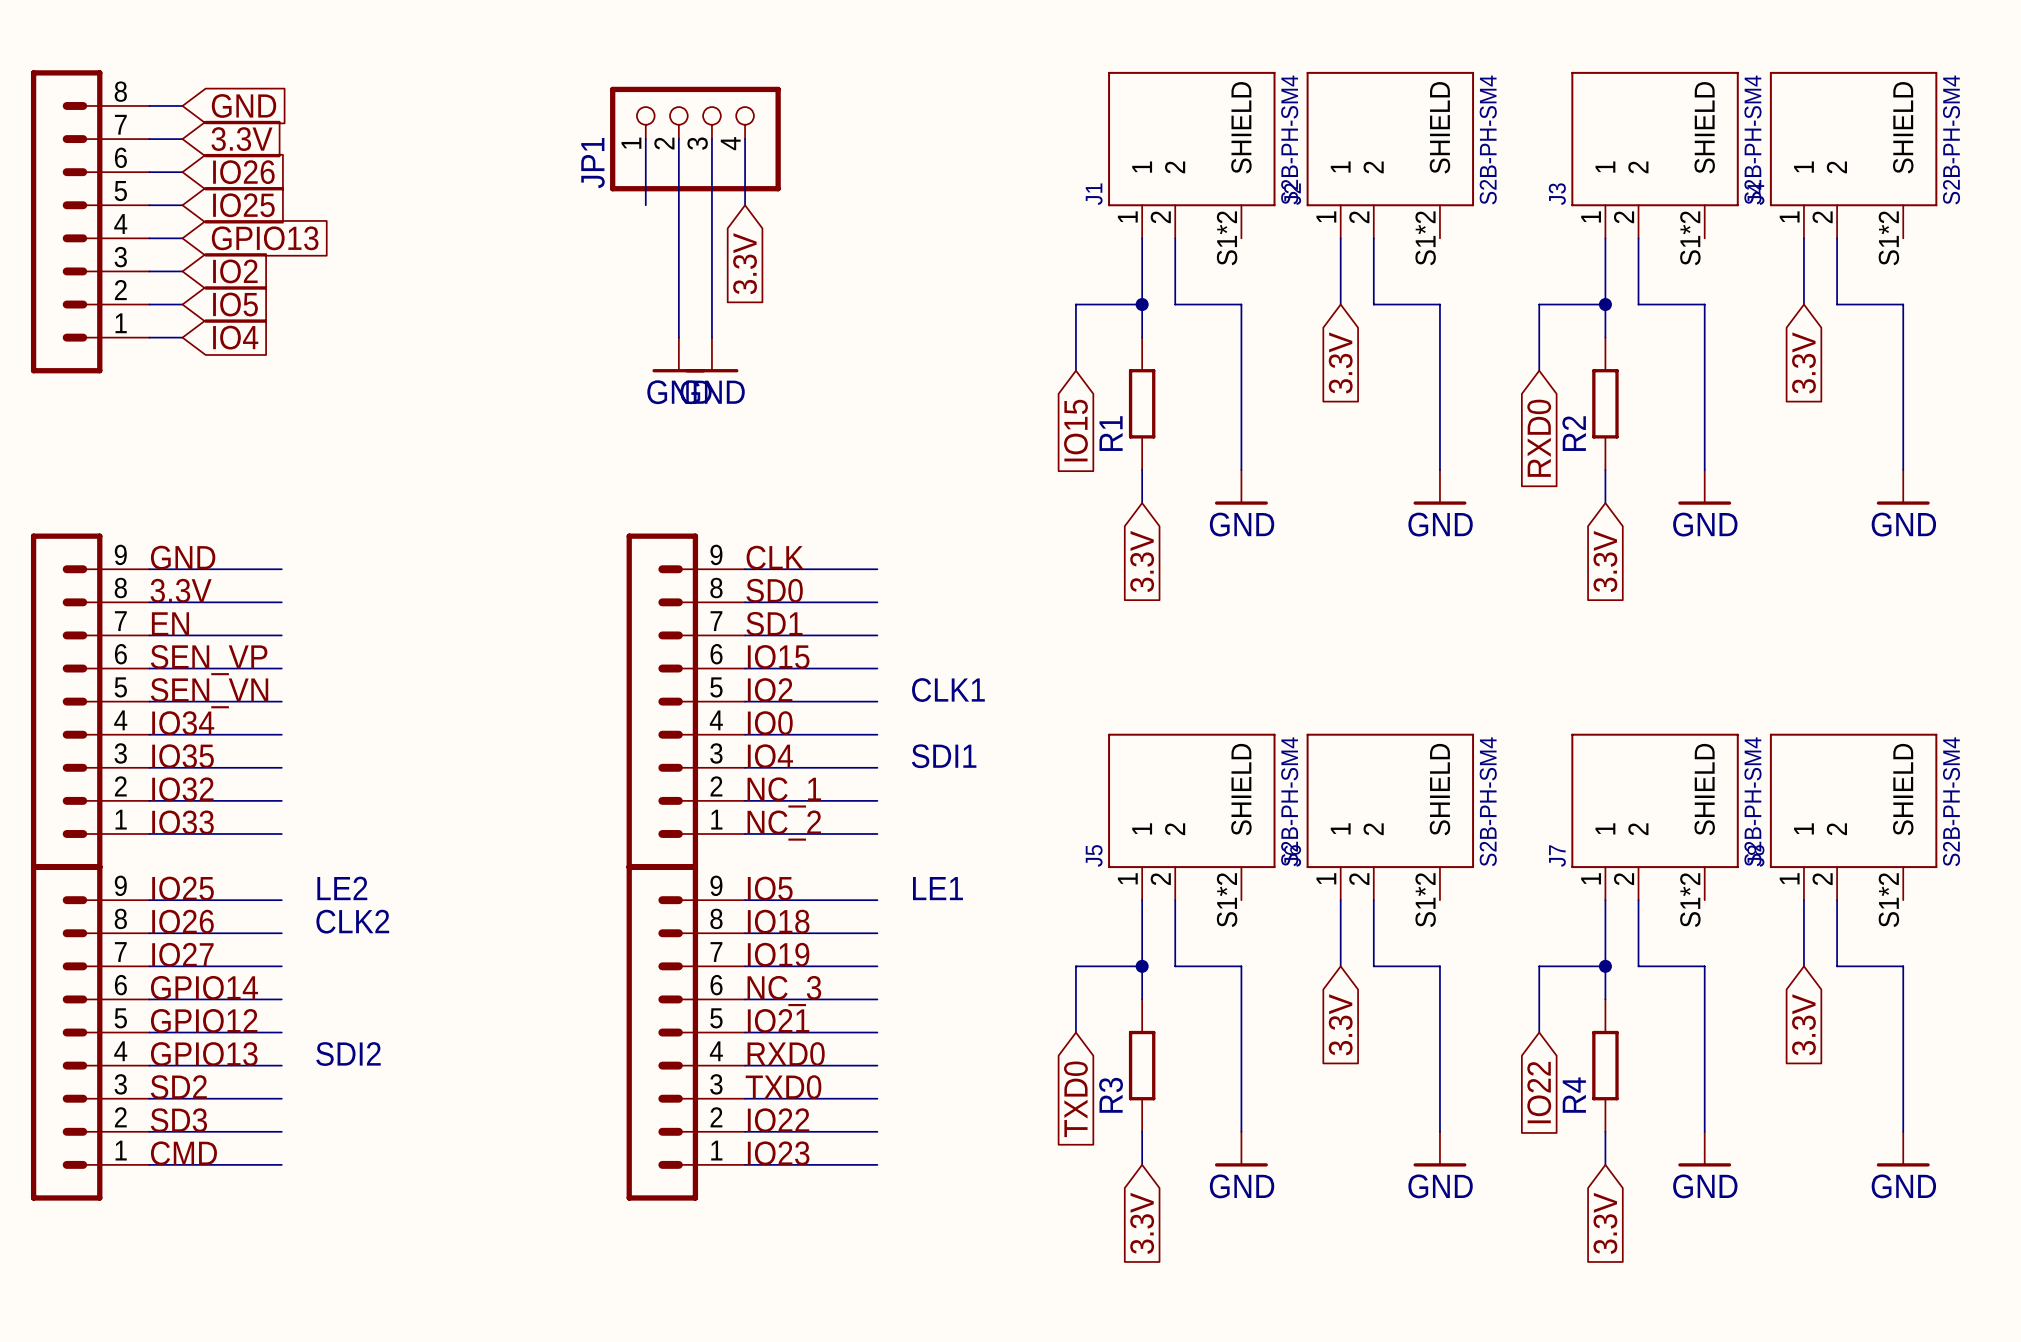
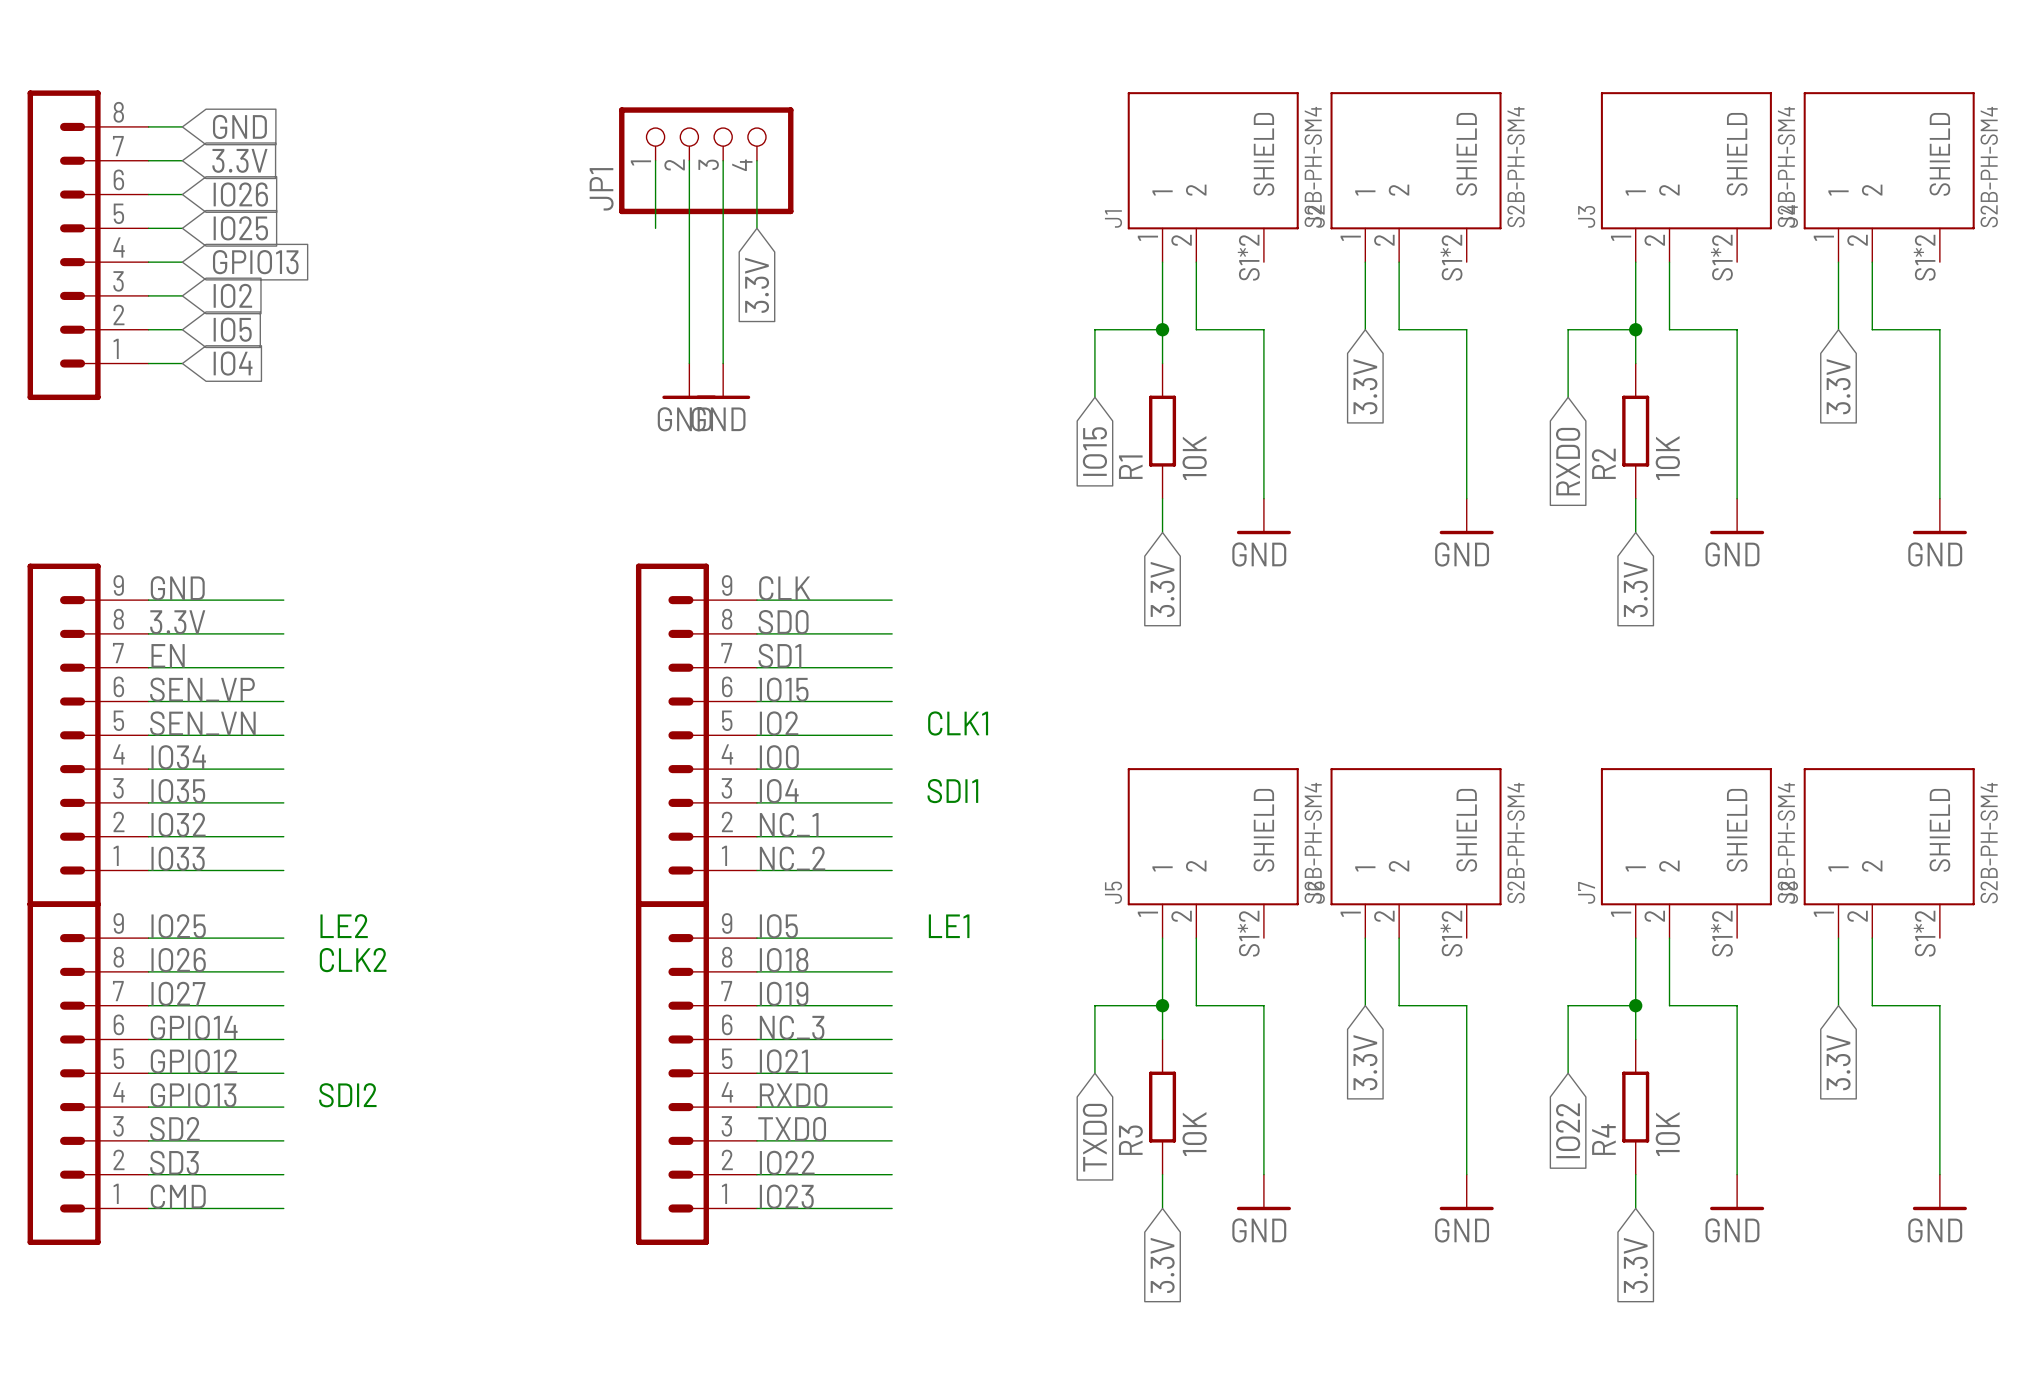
R1 value: none -> 10K (1194, 458)
R2 value: none -> 10K (1667, 458)
R3 value: none -> 10K (1194, 1134)
R4 value: none -> 10K (1667, 1134)

